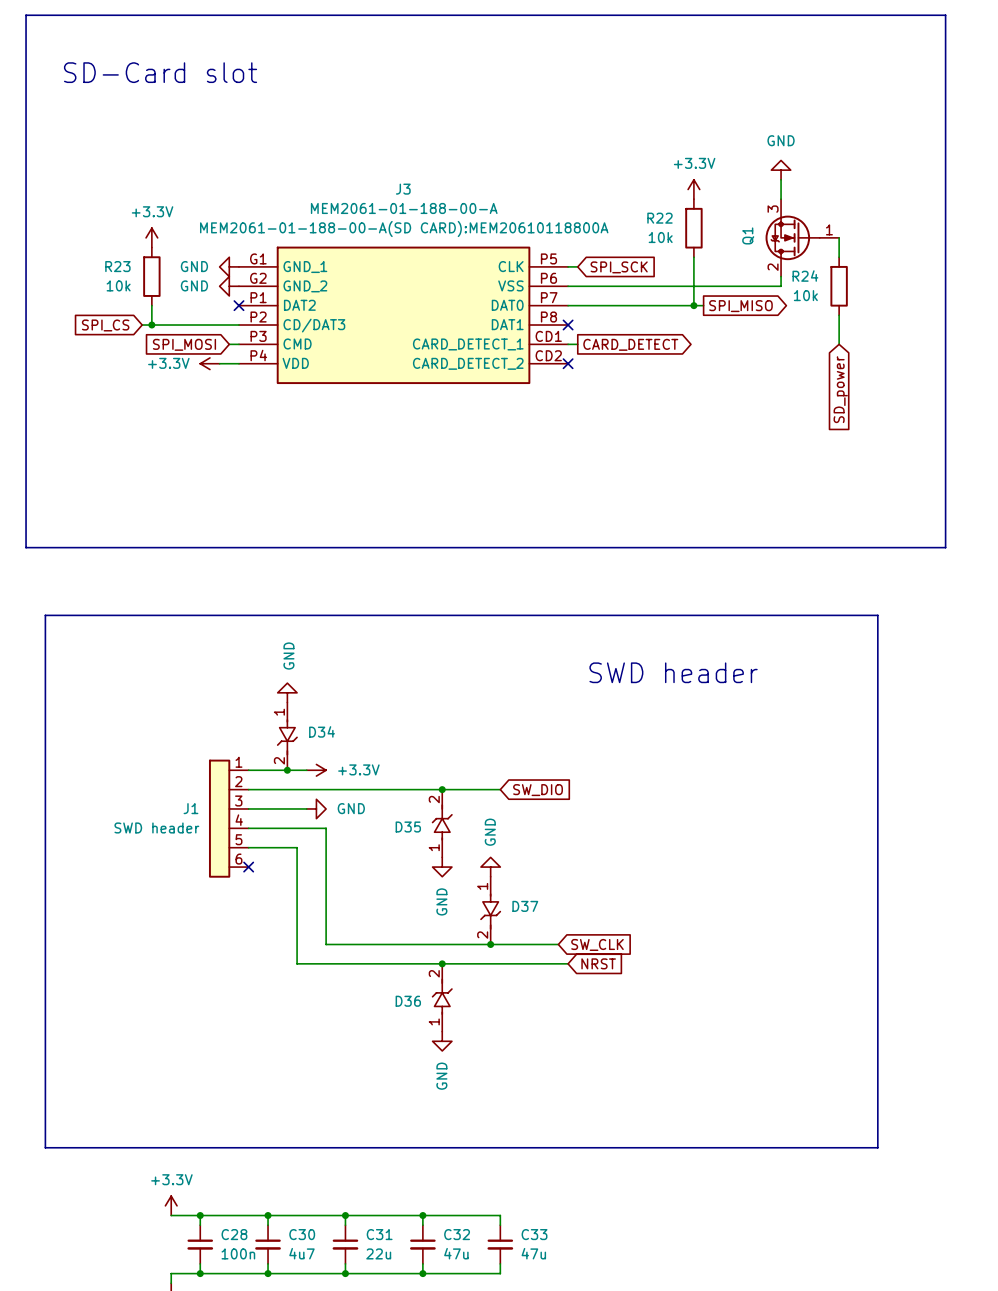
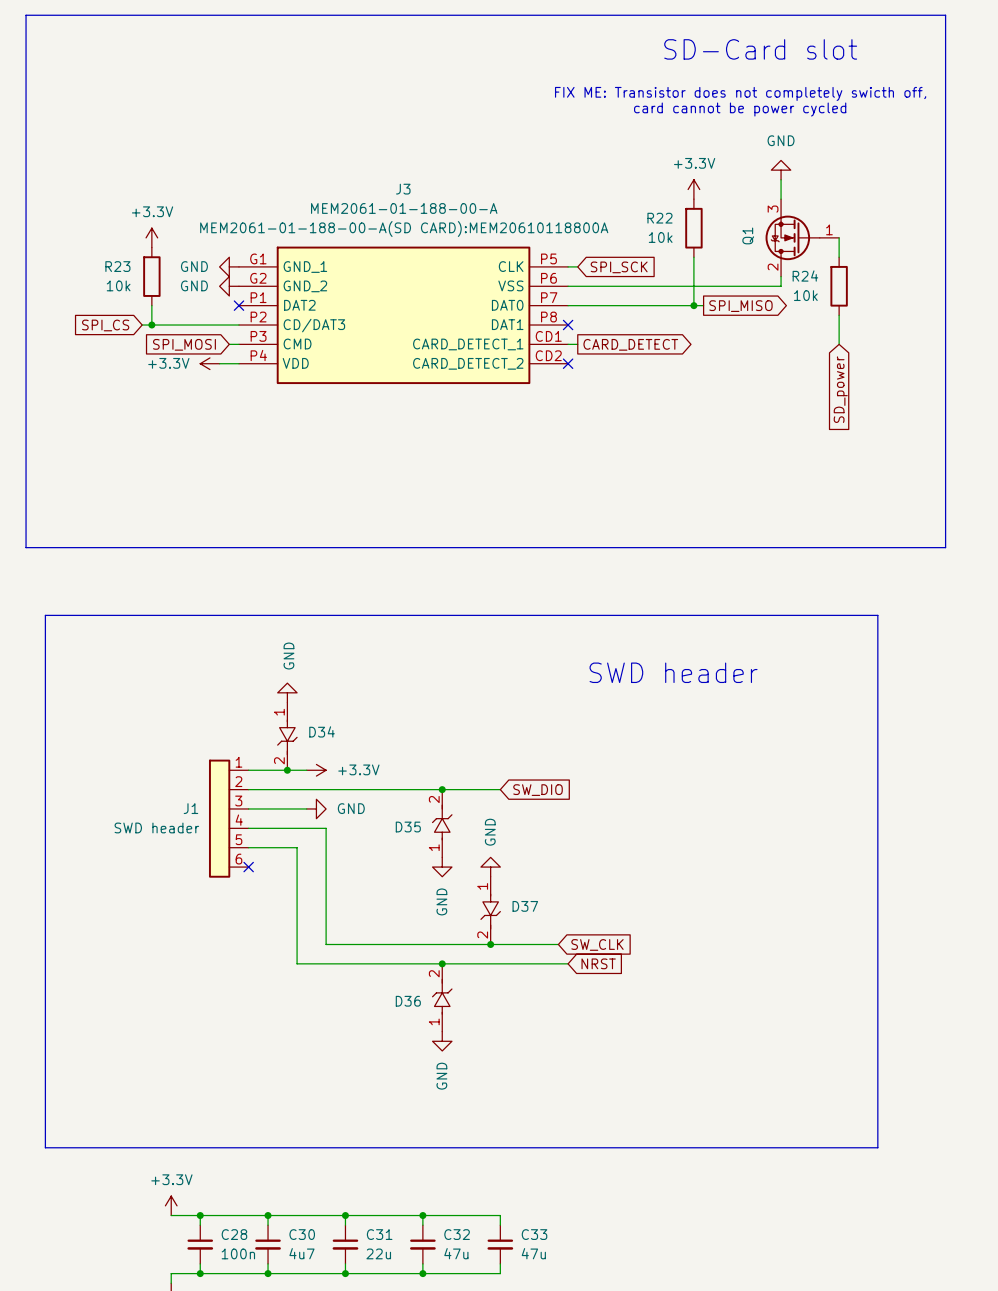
text: none -> SD-Card slot (760, 49)
text: SD-Card slot (160, 72) -> none
text: none -> FIX ME: Transistor does not completely swicth off, (740, 93)
text: none -> card cannot be power cycled (740, 109)

